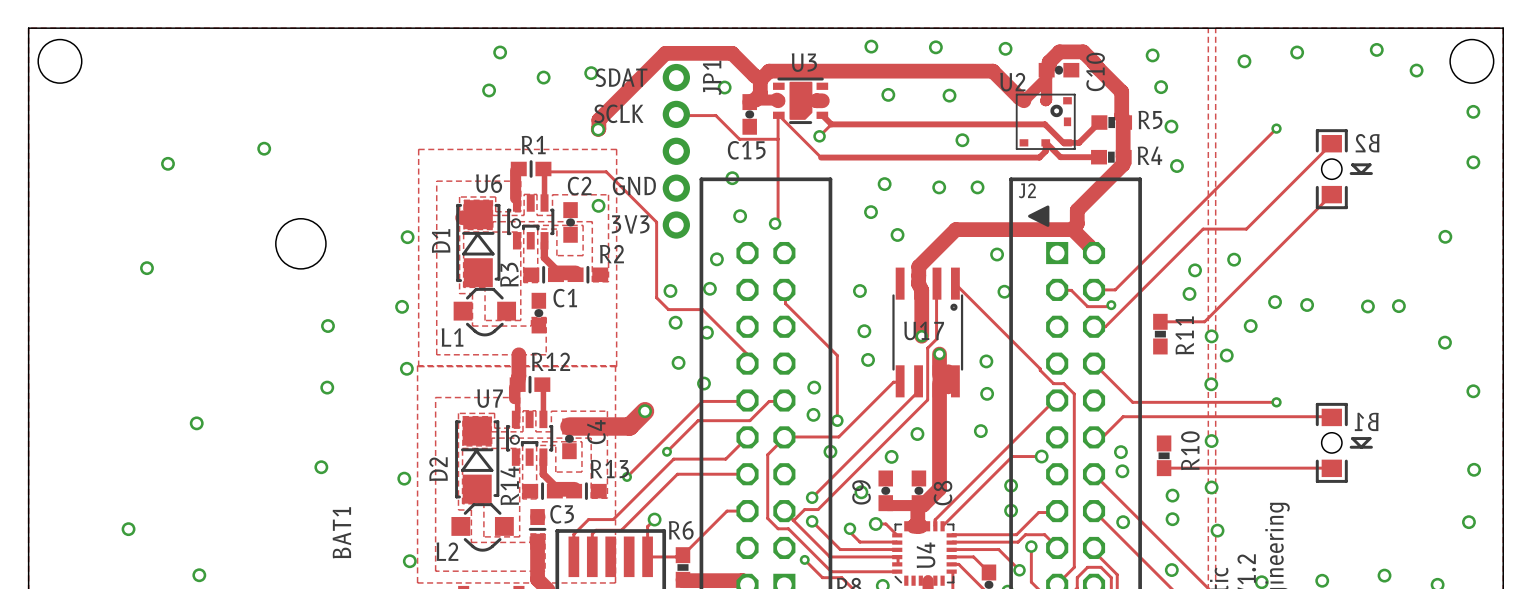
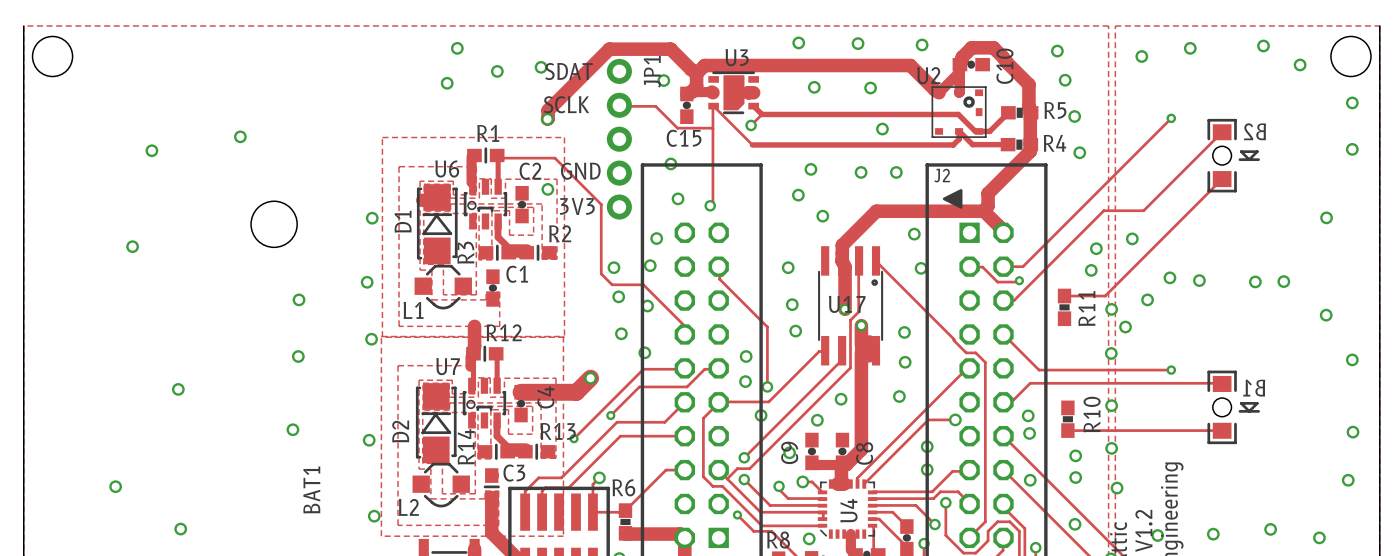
board edge: (28, 28) (1503, 28) -> none

